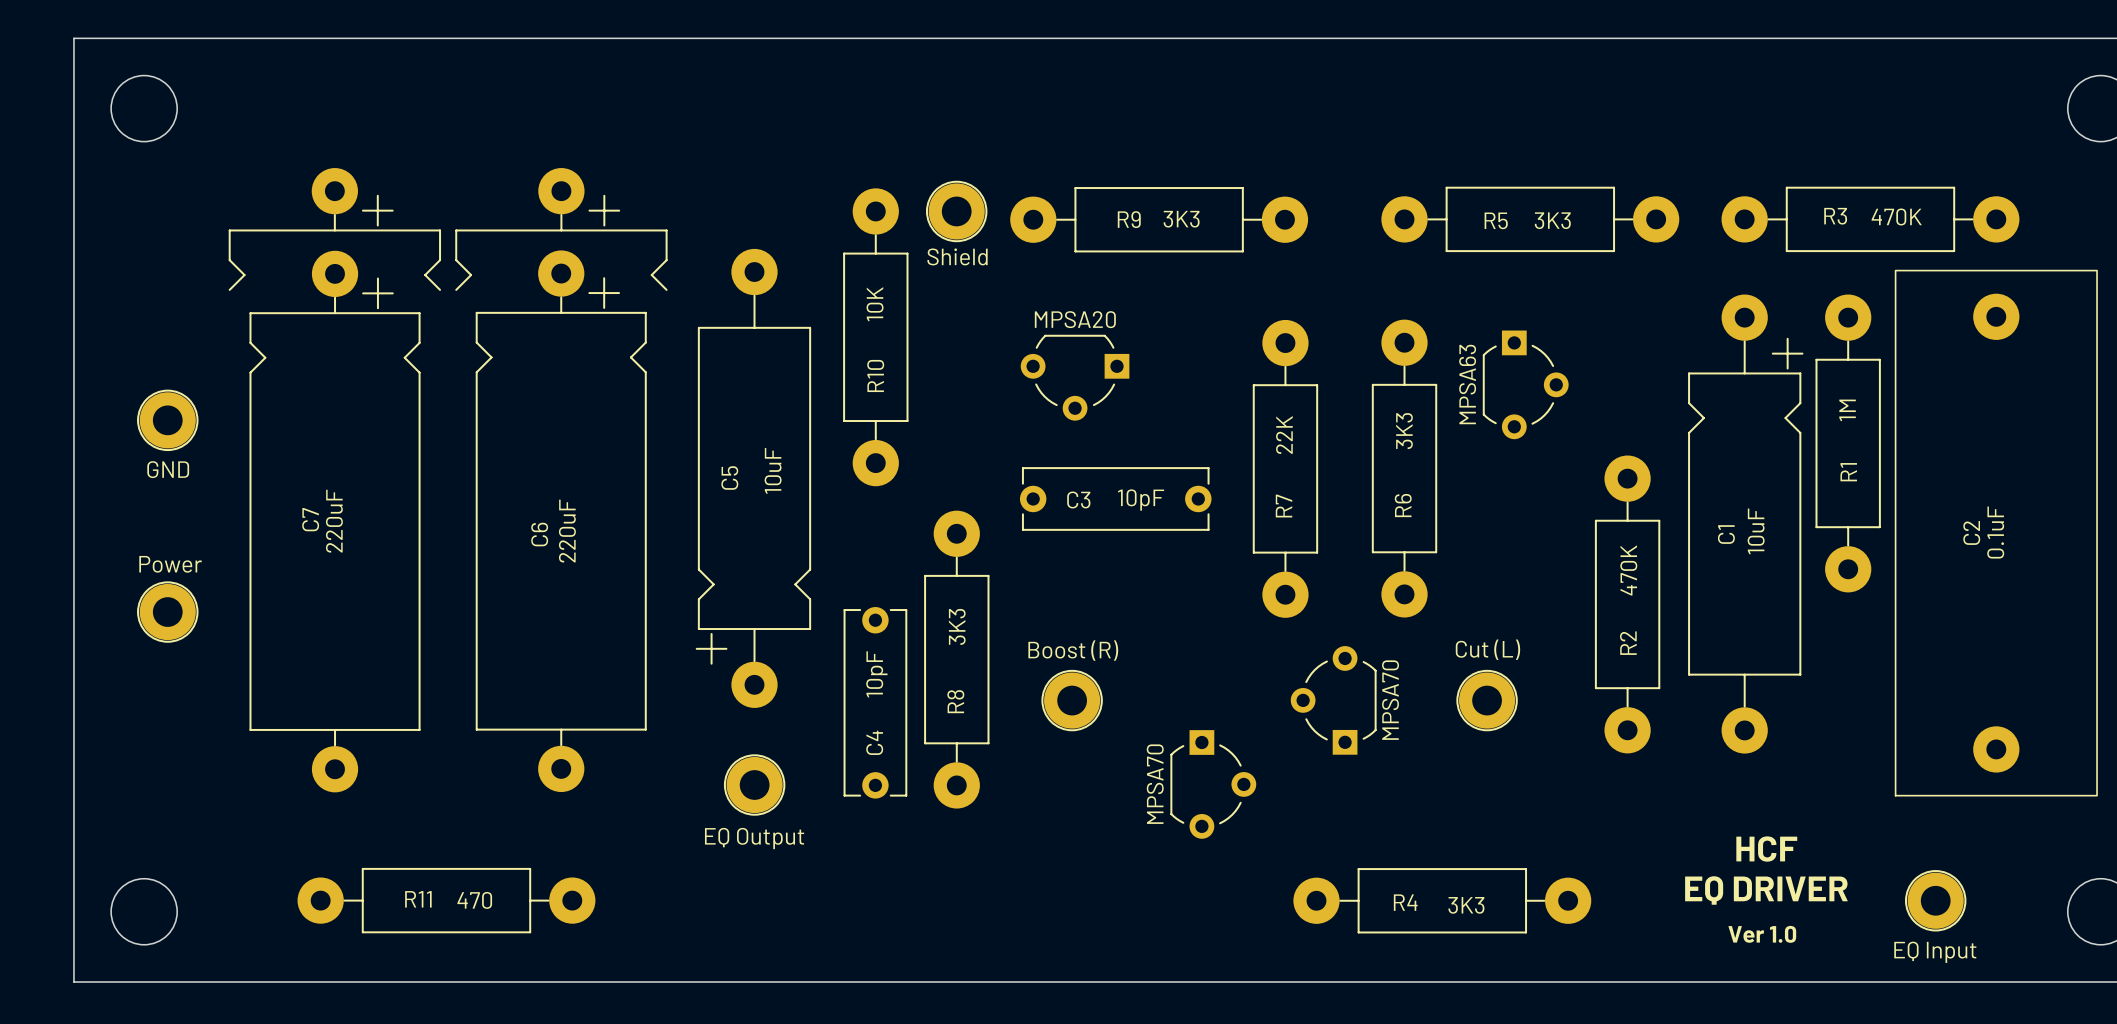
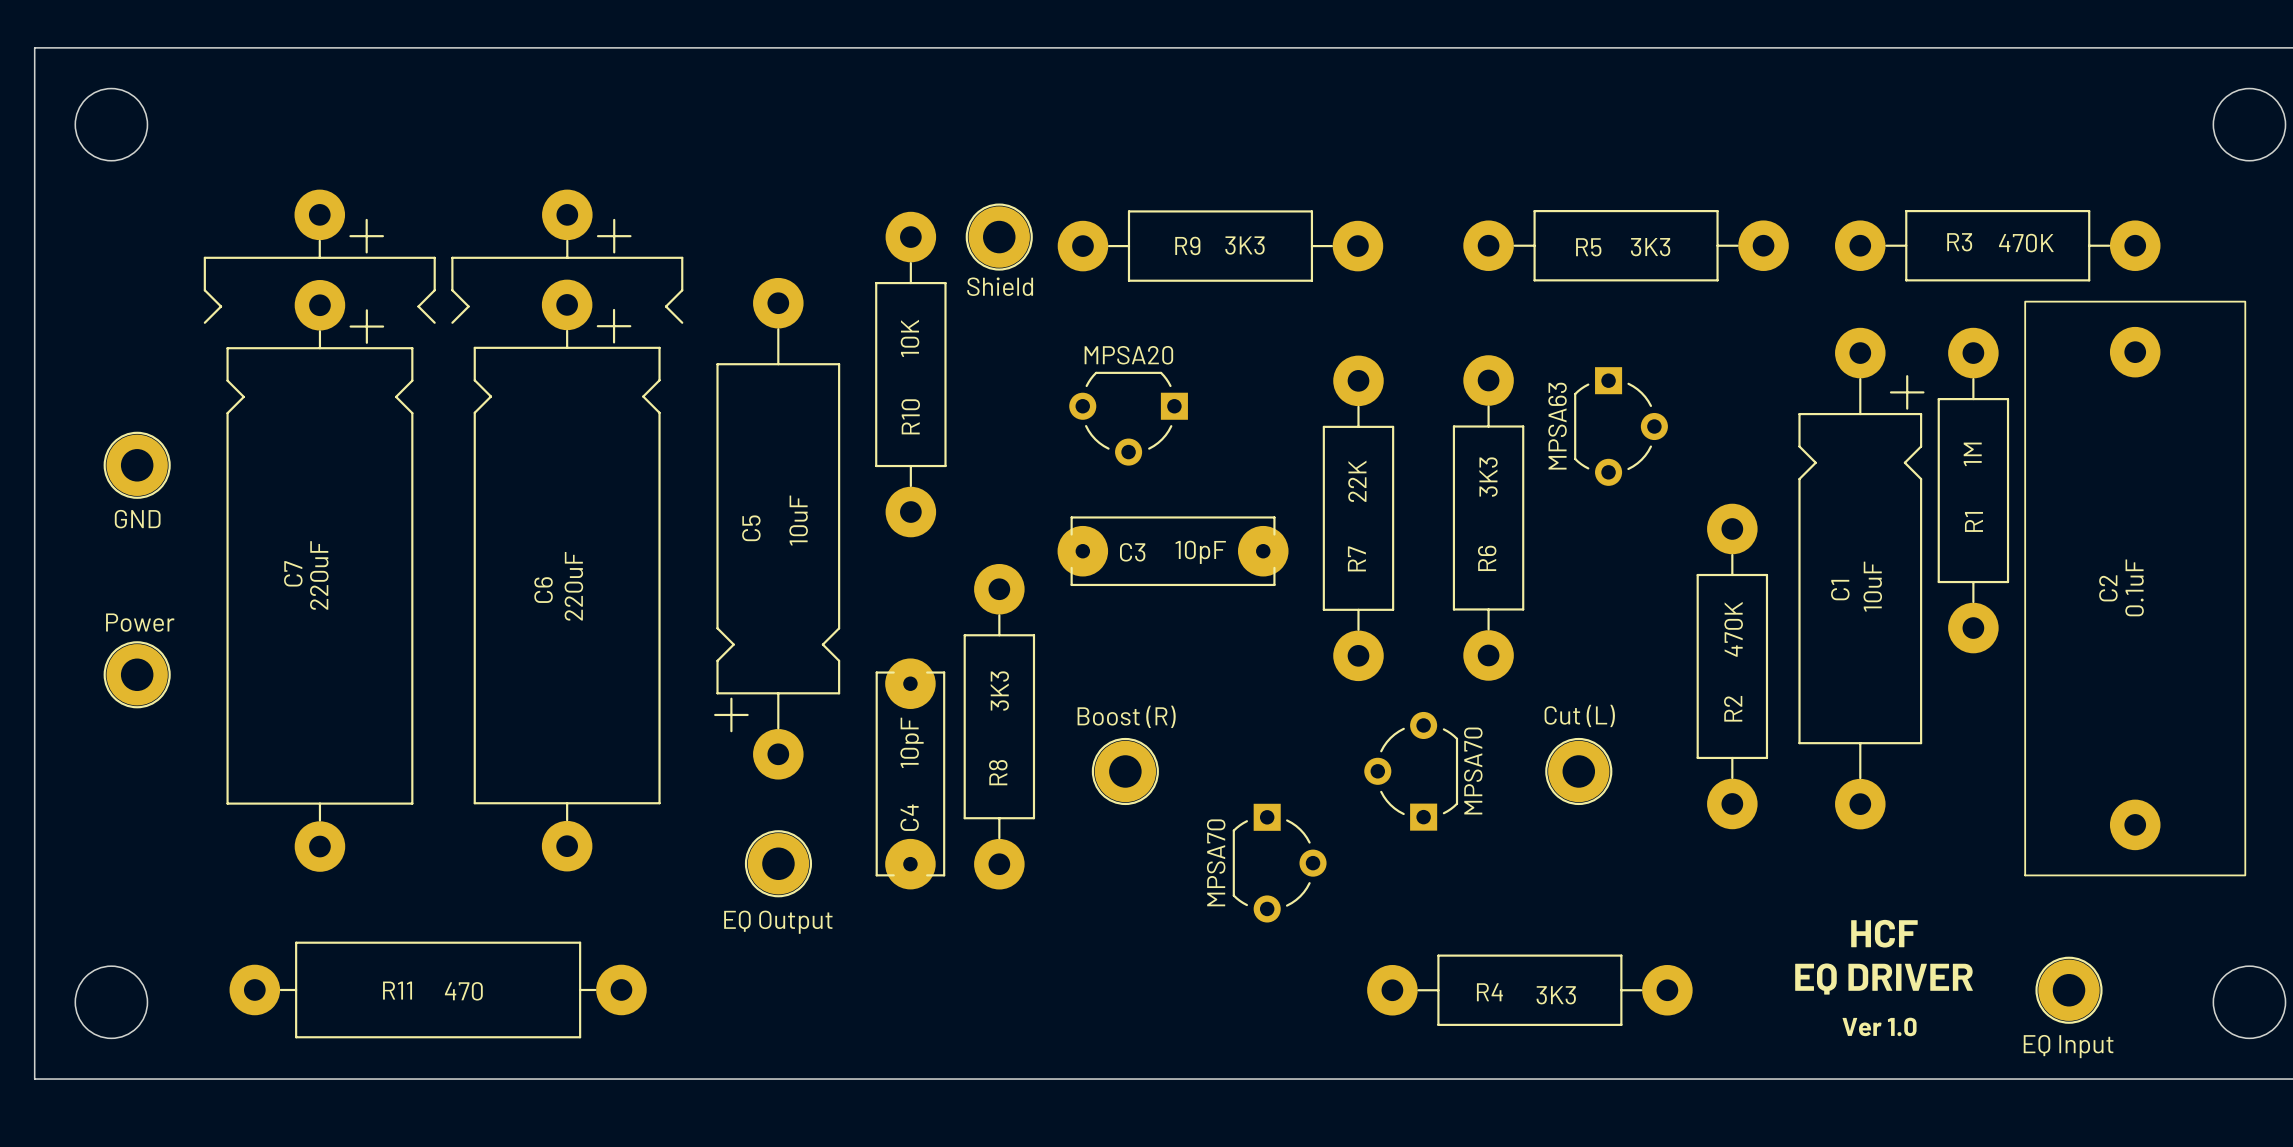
C3 footprint: [1019, 467, 1212, 531] -> [1057, 516, 1289, 587]
C4 footprint: [843, 607, 908, 799] -> [875, 658, 946, 890]
R11 footprint: [297, 867, 596, 934] -> [229, 941, 647, 1039]

